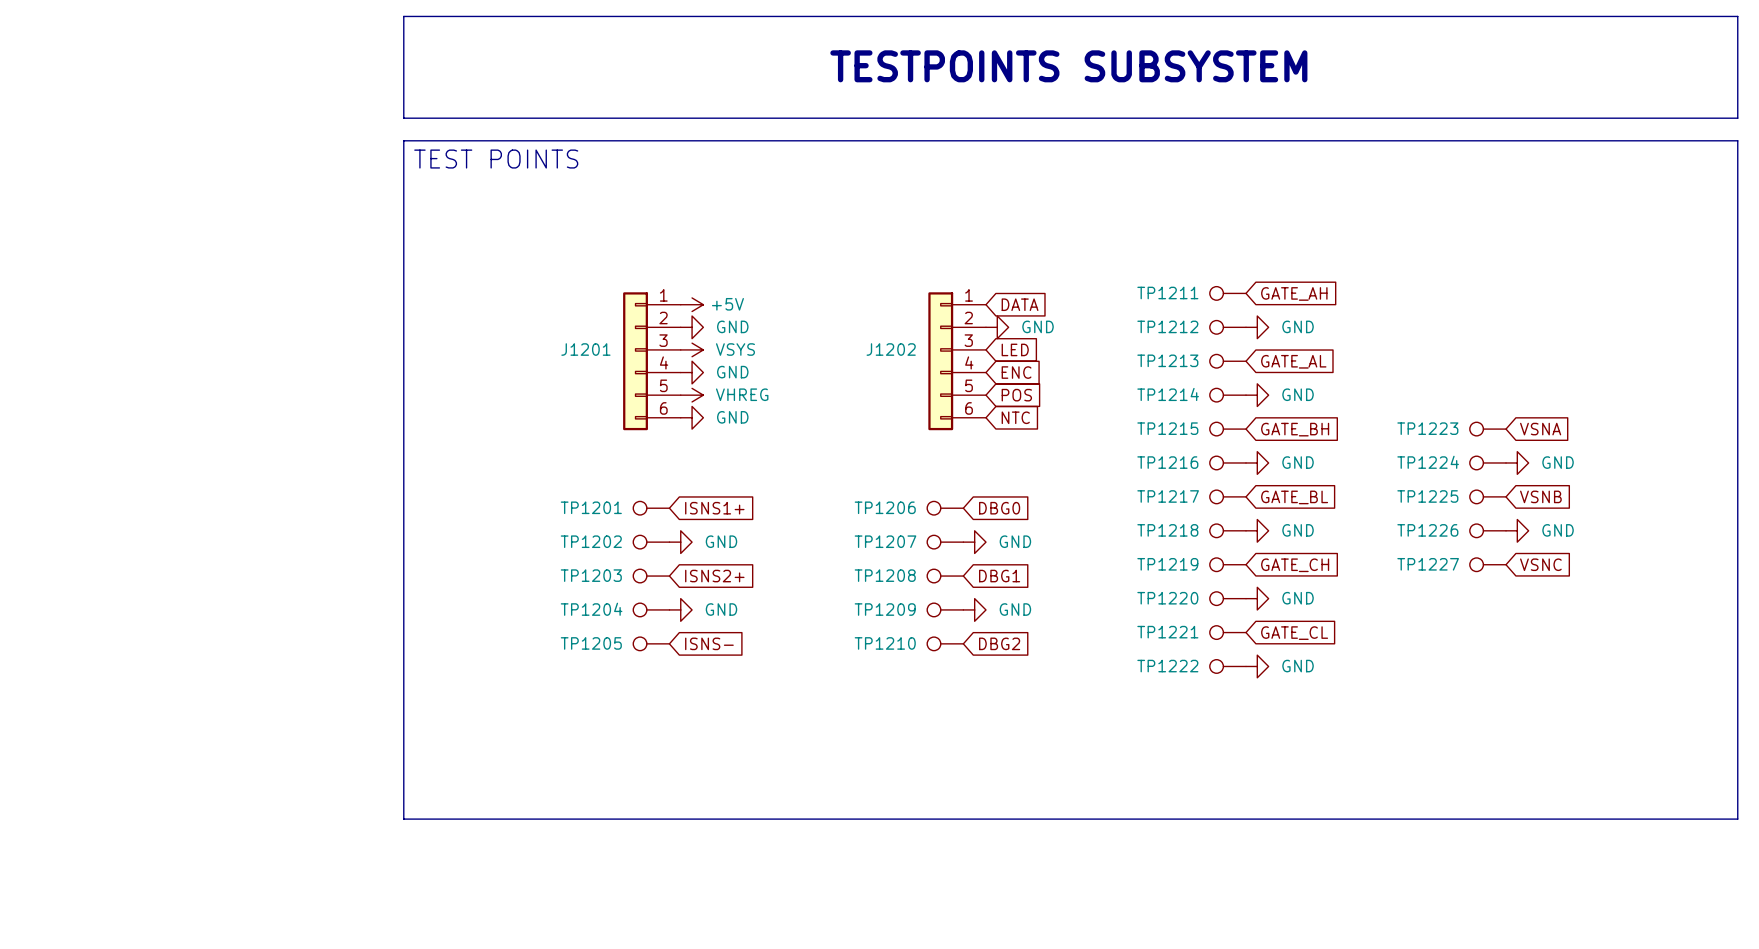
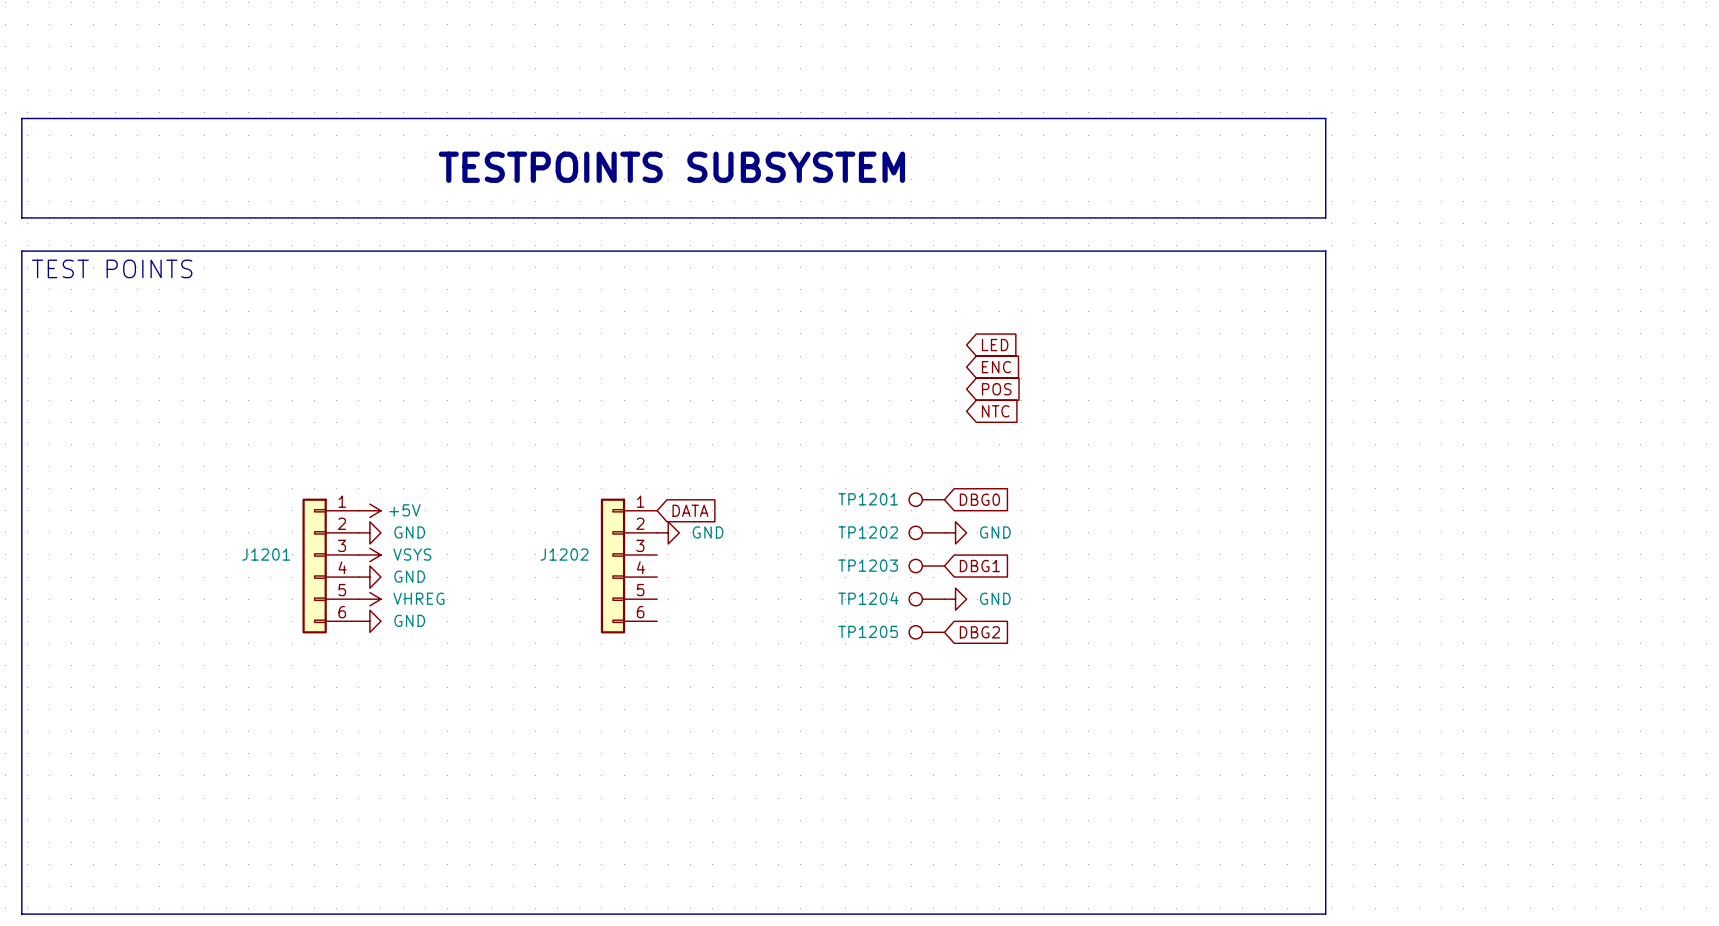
text: TESTPOINTS SUBSYSTEM (1068, 66) -> none
line: (403, 118) (403, 16) (1737, 16) (1737, 118) (1353, 118) -> (397, 118) (21, 118) (21, 217) (1325, 217) (1325, 118)
line: (403, 140) (1737, 140) (1737, 819) (403, 819) (403, 140) -> none
text: TEST POINTS (496, 159) -> none
text: none -> TESTPOINTS SUBSYSTEM (671, 167)
line: none -> (21, 251) (1325, 251) (1325, 914) (21, 914) (21, 251)
text: none -> TEST POINTS (112, 268)
TP1211: (1227, 293) -> none
global label: GATE_AH (1294, 293) -> none
power symbol: +5V (692, 304) -> none
global label: DATA (1020, 304) -> none
power symbol: GND (692, 327) -> none
power symbol: GND (997, 327) -> none
TP1212: (1227, 327) -> none
power symbol: GND (1257, 327) -> none
power symbol: VSYS (692, 349) -> none
J1201 position: (651, 361) -> (330, 566)
J1202 position: (957, 361) -> (629, 566)
TP1213: (1227, 361) -> none
global label: GATE_AL (1293, 361) -> none
power symbol: GND (692, 372) -> none
power symbol: VHREG (692, 395) -> none
TP1214: (1227, 395) -> none
power symbol: GND (1257, 395) -> none
power symbol: GND (692, 417) -> none
TP1215: (1227, 429) -> none
global label: GATE_BH (1295, 429) -> none
TP1223: (1487, 429) -> none
global label: VSNA (1540, 429) -> none
TP1216: (1227, 462) -> none
power symbol: GND (1257, 462) -> none
TP1224: (1487, 462) -> none
power symbol: GND (1517, 462) -> none
TP1217: (1227, 496) -> none
TP1225: (1487, 496) -> none
global label: VSNB (1540, 496) -> none
global label: GATE_BL (1294, 497) -> none
TP1206 name: TP1206 (885, 507) -> TP1201 (868, 499)
TP1201: (651, 508) -> none
global label: ISNS1+ (714, 508) -> none
power symbol: none -> +5V (369, 510)
global label: none -> DATA (690, 510)
TP1218: (1227, 530) -> none
power symbol: GND (1257, 530) -> none
TP1226: (1487, 530) -> none
power symbol: GND (1517, 530) -> none
TP1207 name: TP1207 (885, 541) -> TP1202 (868, 532)
power symbol: none -> GND (369, 532)
TP1202: (651, 542) -> none
power symbol: none -> VSYS (369, 554)
TP1219: (1227, 564) -> none
TP1227: (1487, 564) -> none
global label: VSNC (1540, 564) -> none
global label: GATE_CH (1295, 565) -> none
TP1208 name: TP1208 (885, 575) -> TP1203 (868, 565)
TP1203: (651, 576) -> none
global label: ISNS2+ (714, 576) -> none
power symbol: none -> GND (369, 577)
TP1220: (1227, 598) -> none
power symbol: GND (1257, 598) -> none
power symbol: none -> VHREG (369, 599)
TP1204: (651, 609) -> none
power symbol: GND (680, 609) -> none
TP1209 name: TP1209 (885, 609) -> TP1204 (868, 598)
power symbol: none -> GND (369, 621)
TP1221: (1227, 632) -> none
global label: GATE_CL (1294, 633) -> none
TP1205: (651, 643) -> none
global label: ISNS- (709, 643) -> none
TP1210 name: TP1210 (885, 643) -> TP1205 (868, 631)
TP1222: (1227, 666) -> none
power symbol: GND (1257, 666) -> none

